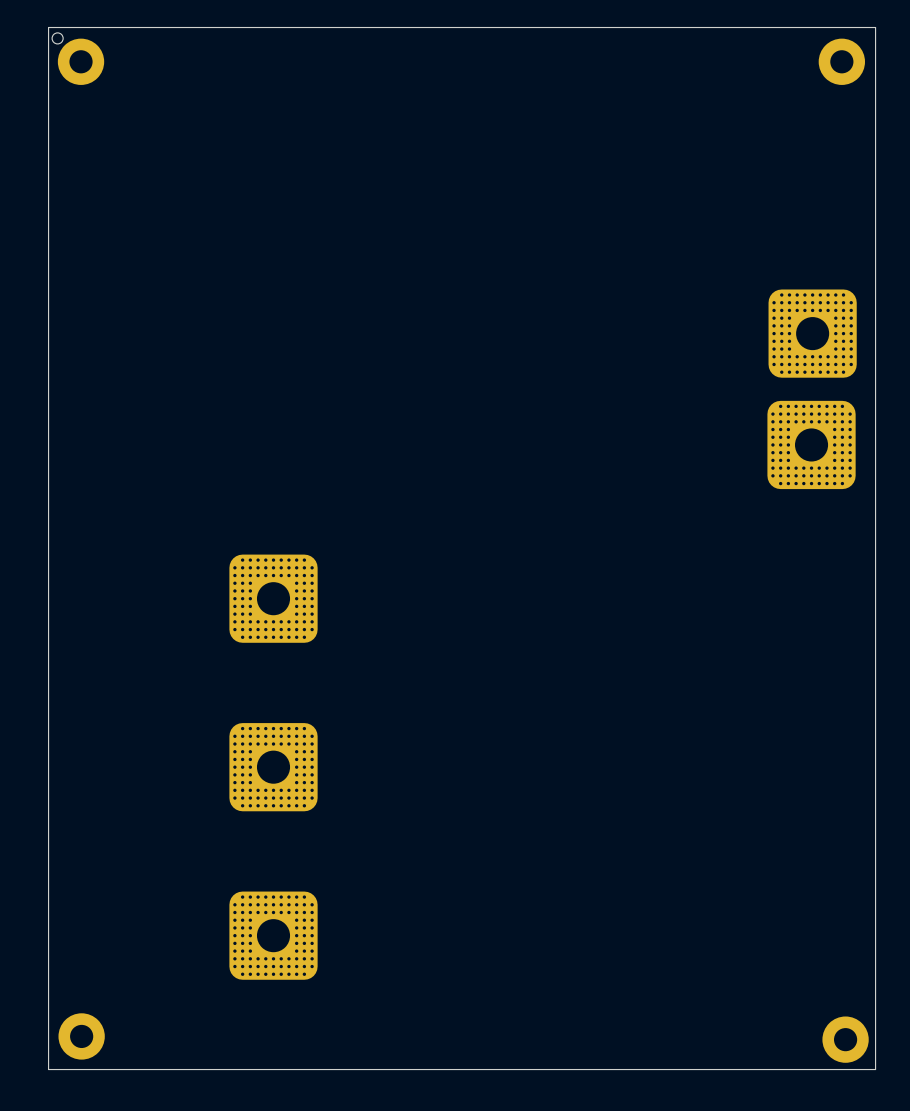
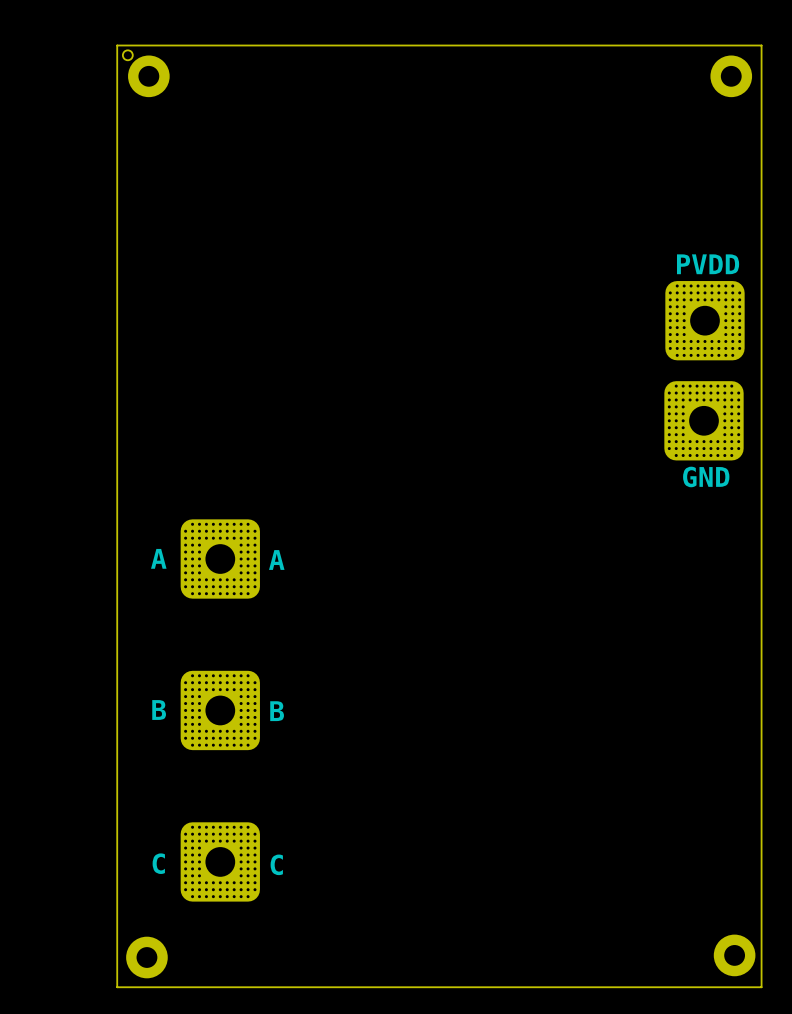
board edge: (158, 27) (48, 27) (48, 1069) (875, 1069) -> (117, 45) (117, 987) (761, 987) (761, 982)
part position: (78, 58) -> (146, 73)
text: none -> PVDD (708, 264)
text: none -> GND (706, 476)
text: none -> A (158, 558)
text: none -> A (276, 560)
text: none -> B (159, 710)
text: none -> B (277, 711)
text: none -> C (158, 863)
text: none -> C (276, 864)
part position: (81, 1036) -> (146, 957)

